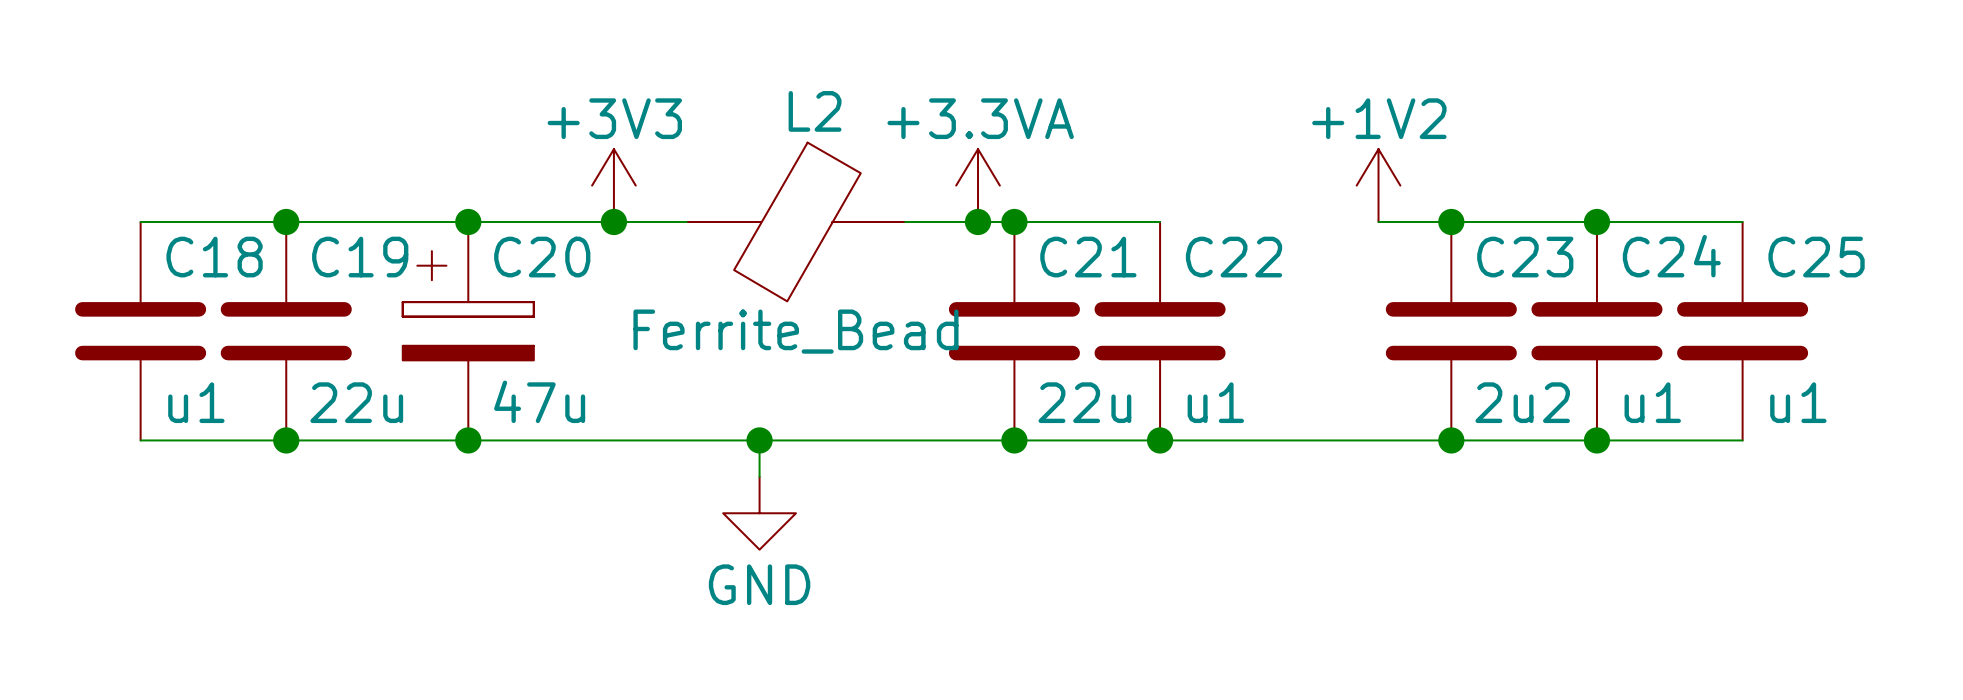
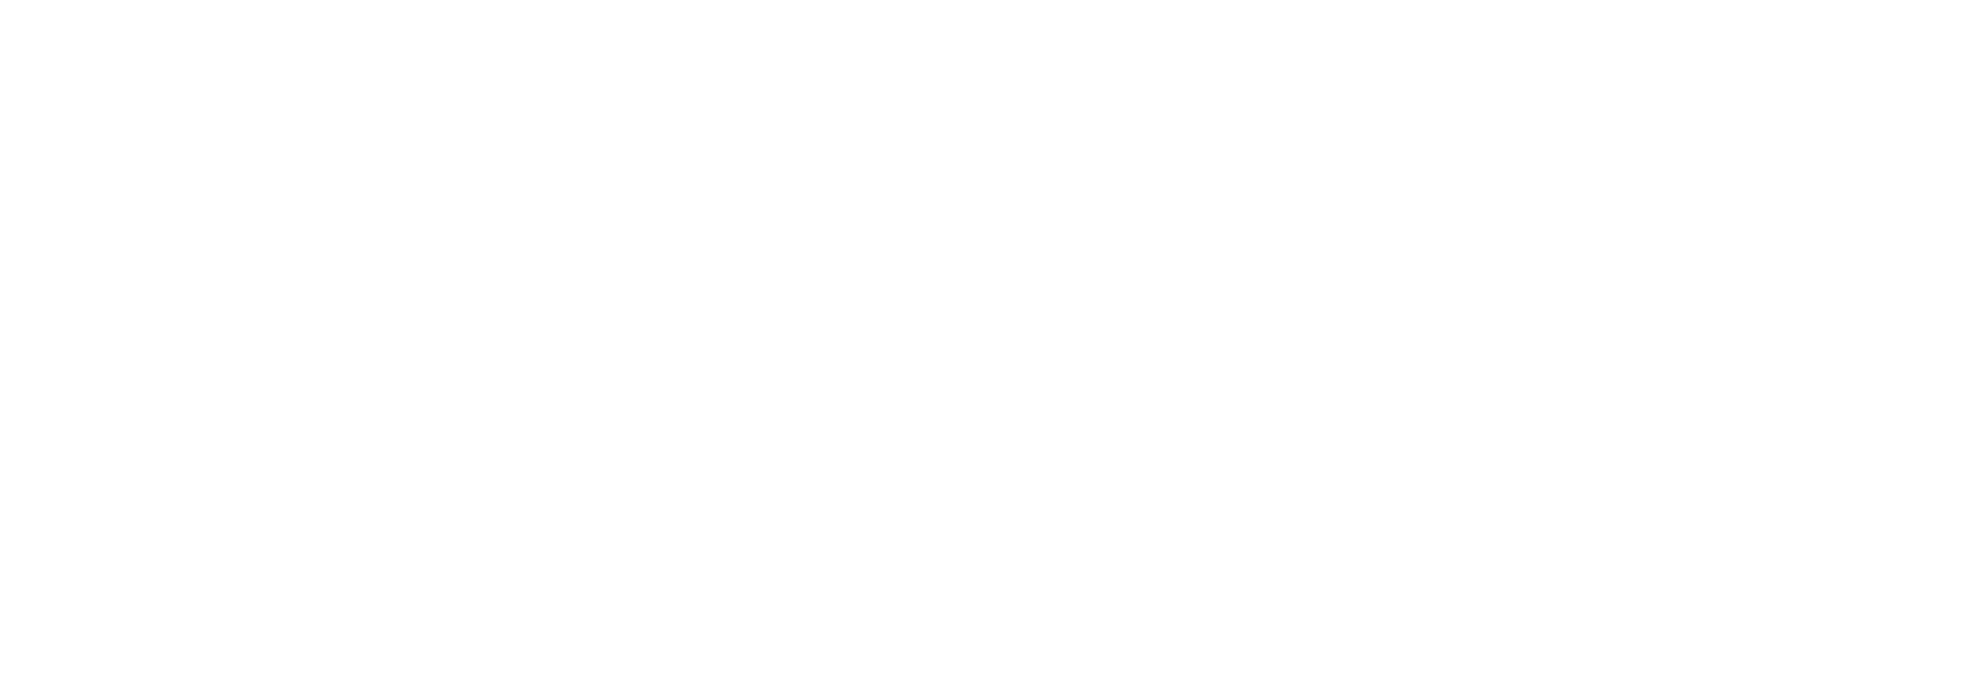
power symbol: +3V3 (613, 185) -> none
power symbol: +3.3VA (978, 185) -> none
power symbol: +1V2 (1378, 185) -> none
wire: (140, 221) (686, 221) -> none
junction: (286, 221) -> none
junction: (468, 221) -> none
junction: (613, 221) -> none
L2: Ferrite_Bead (795, 221) -> none
wire: (905, 221) (1160, 221) -> none
junction: (978, 221) -> none
junction: (1014, 221) -> none
wire: (1378, 221) (1742, 221) -> none
junction: (1451, 221) -> none
junction: (1596, 221) -> none
C18: u1 (140, 331) -> none
C19: 22u (286, 331) -> none
C20: 47u (468, 331) -> none
C21: 22u (1014, 331) -> none
C22: u1 (1160, 331) -> none
C23: 2u2 (1451, 331) -> none
C24: u1 (1596, 331) -> none
C25: u1 (1742, 331) -> none
wire: (140, 440) (1742, 440) -> none
junction: (286, 440) -> none
junction: (468, 440) -> none
wire: (759, 440) (759, 476) -> none
junction: (759, 440) -> none
junction: (1014, 440) -> none
junction: (1160, 440) -> none
junction: (1451, 440) -> none
junction: (1596, 440) -> none
power symbol: GND (759, 513) -> none

